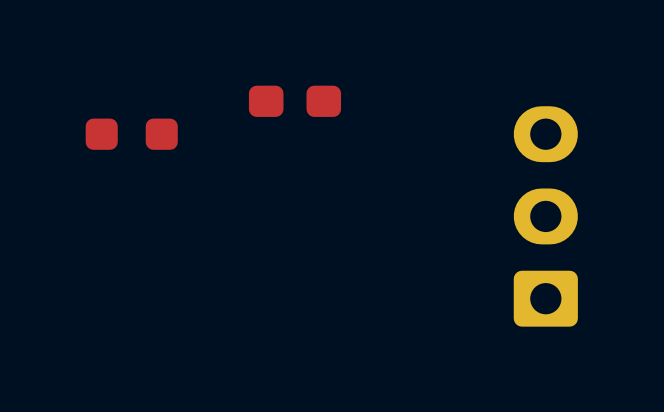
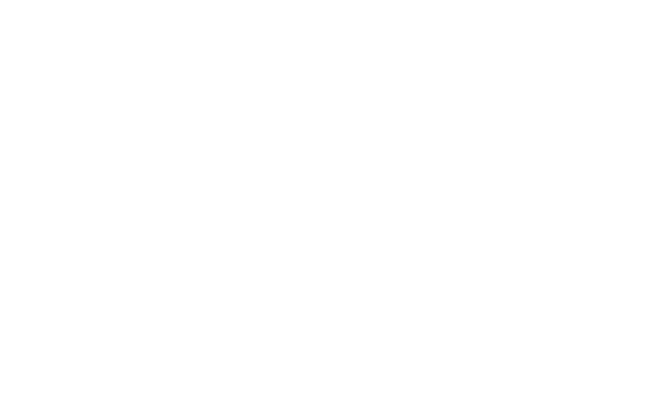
part: (294, 101) -> none
part: (131, 134) -> none
part: (545, 216) -> none

